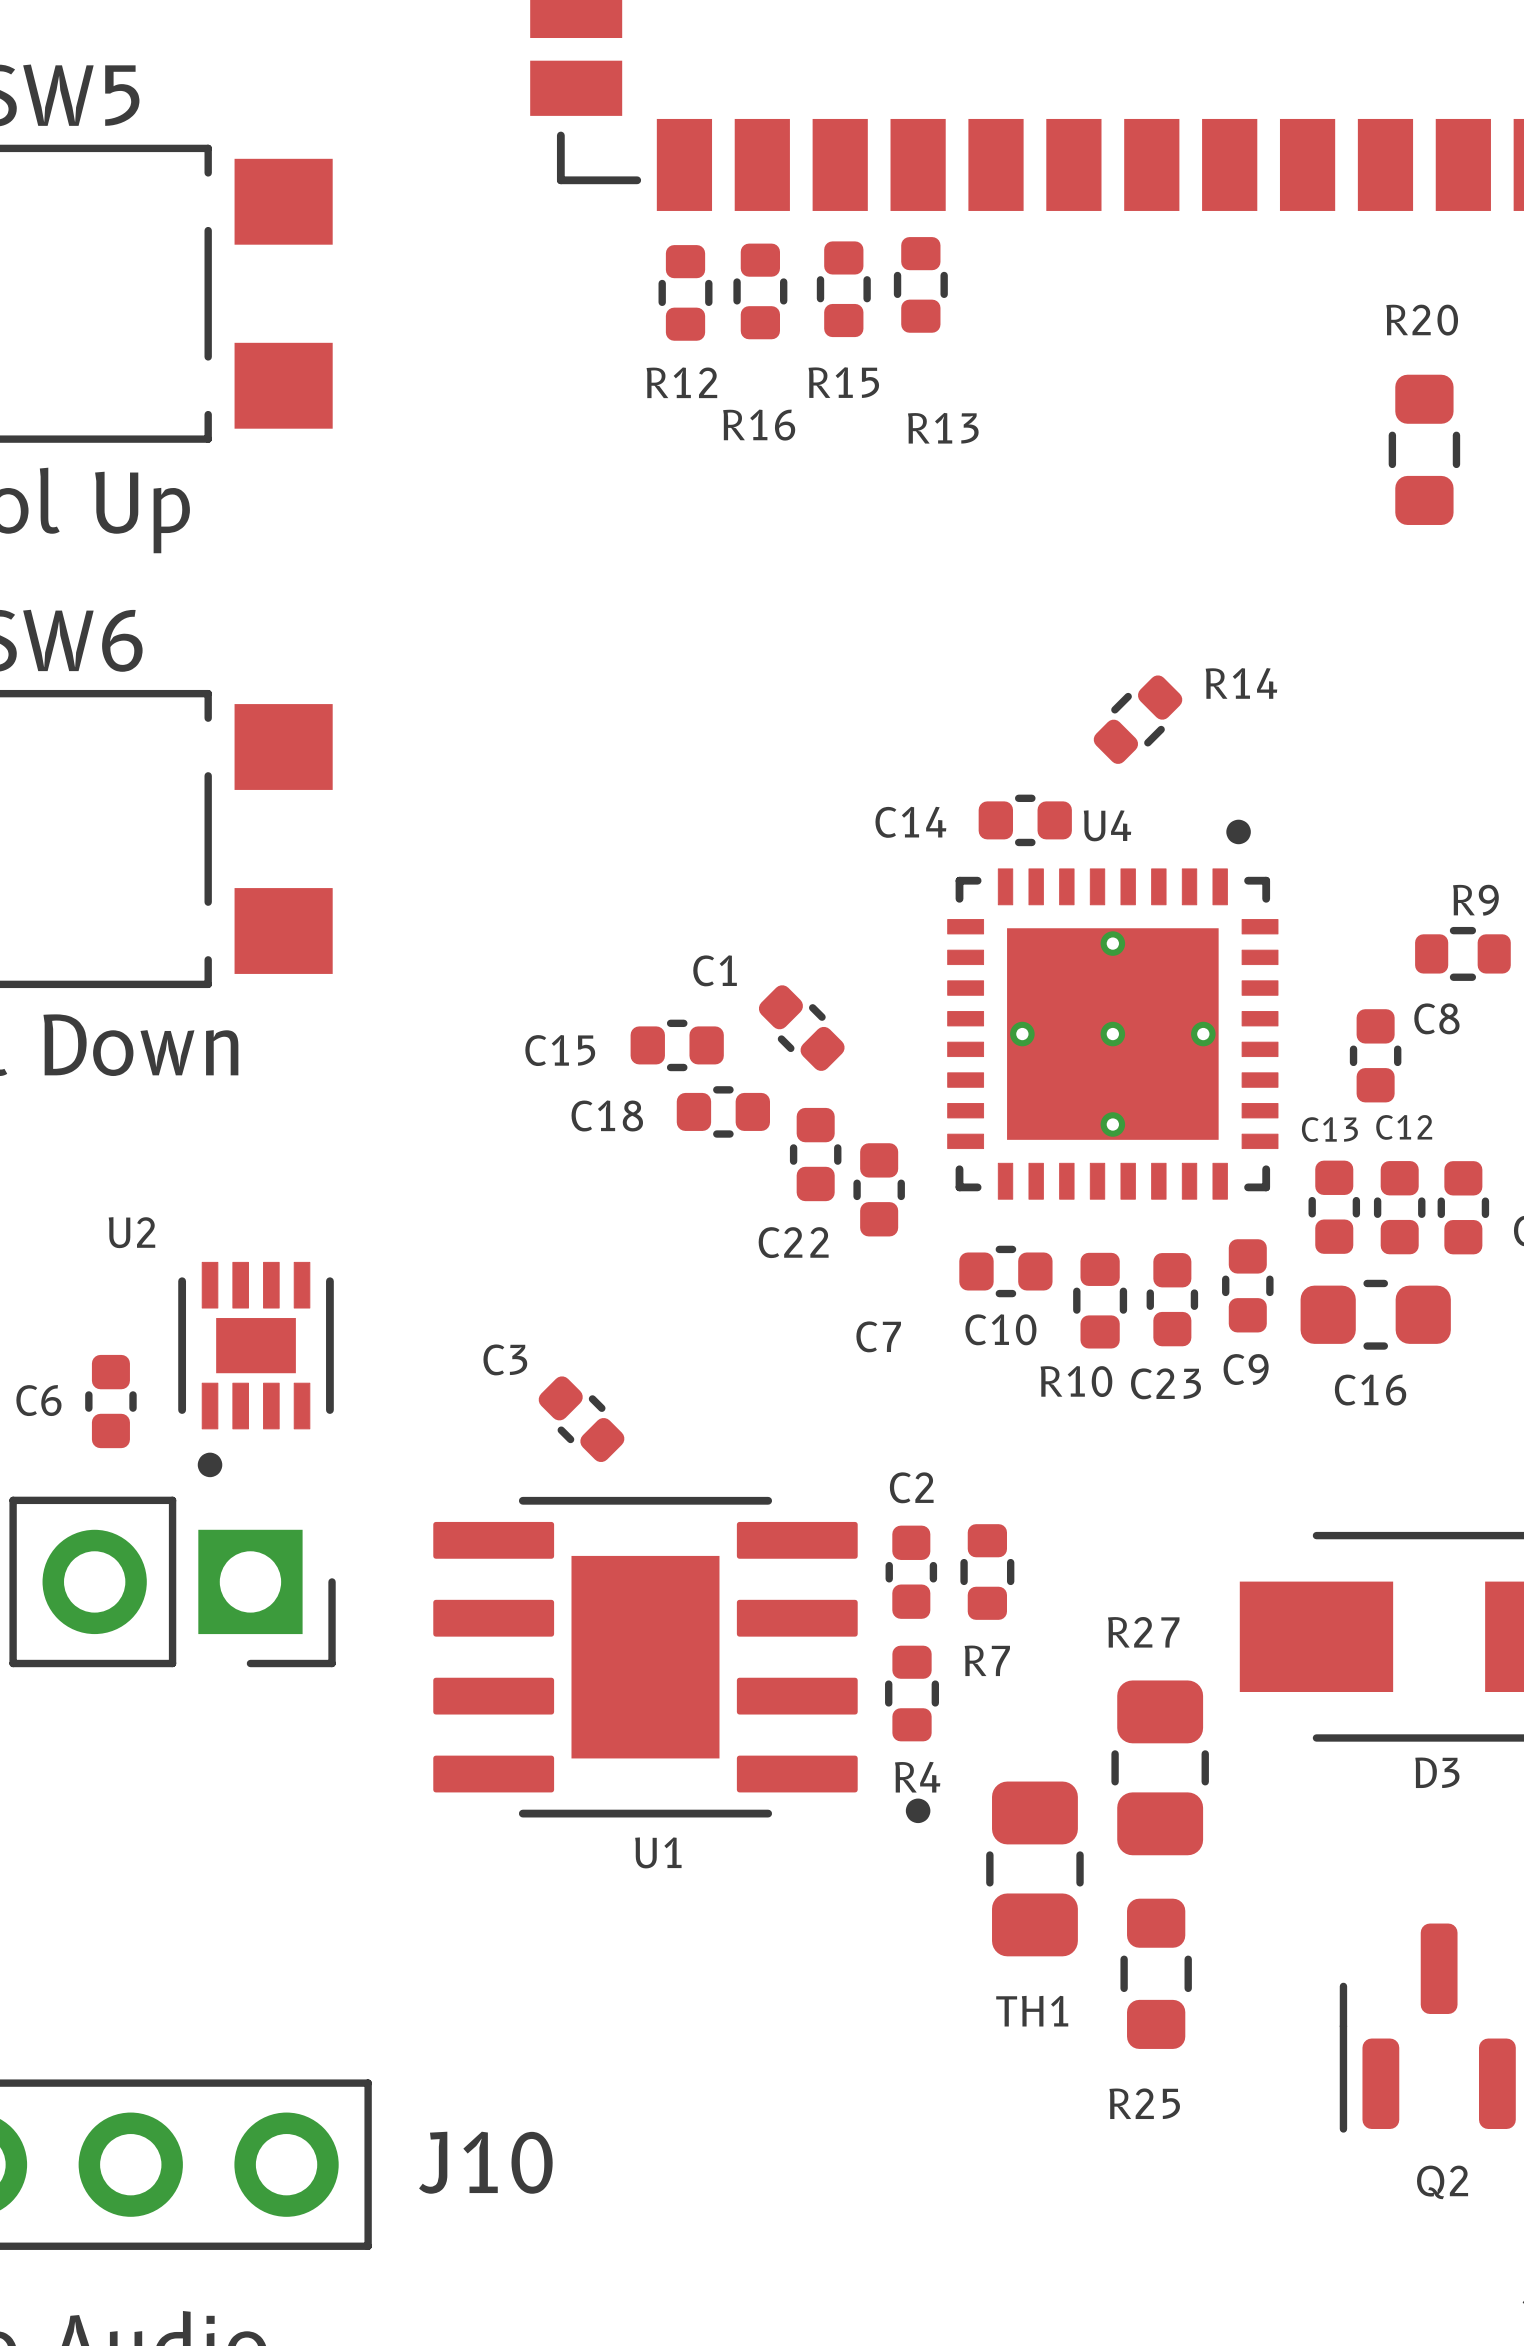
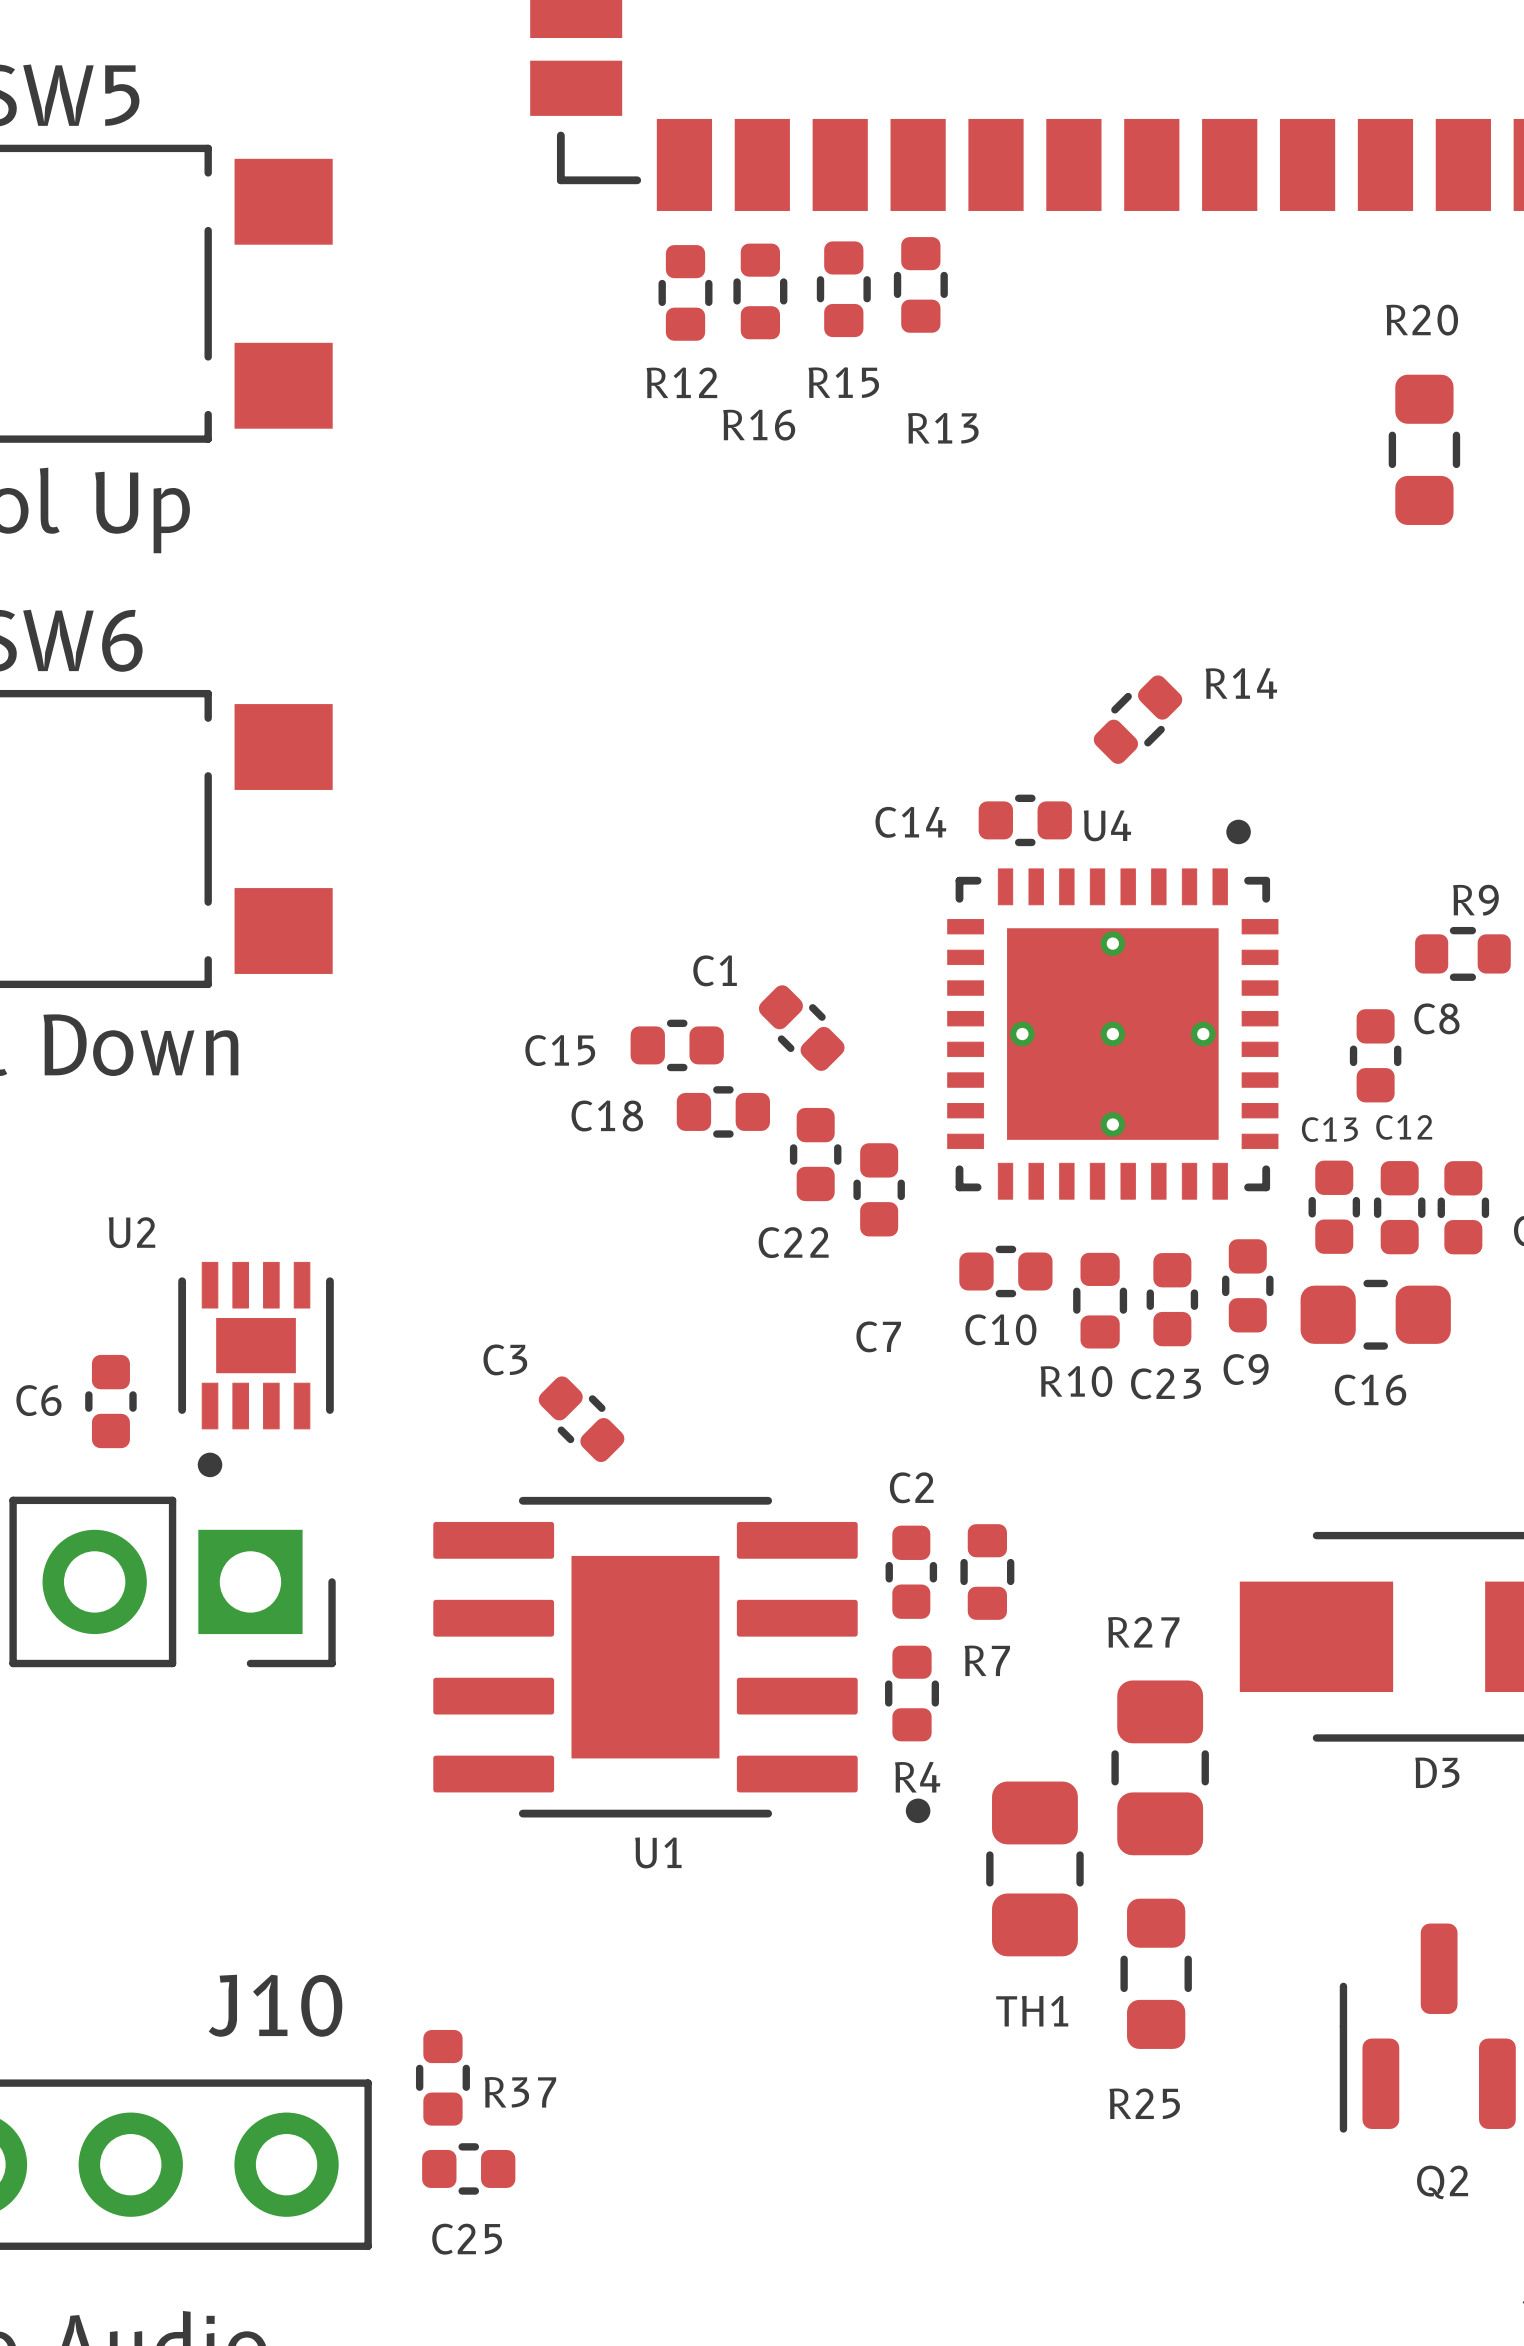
R37: none -> (442, 2077)
J10 name position: J10 (485, 2162) -> J10 (275, 2005)
C25: none -> (468, 2168)

